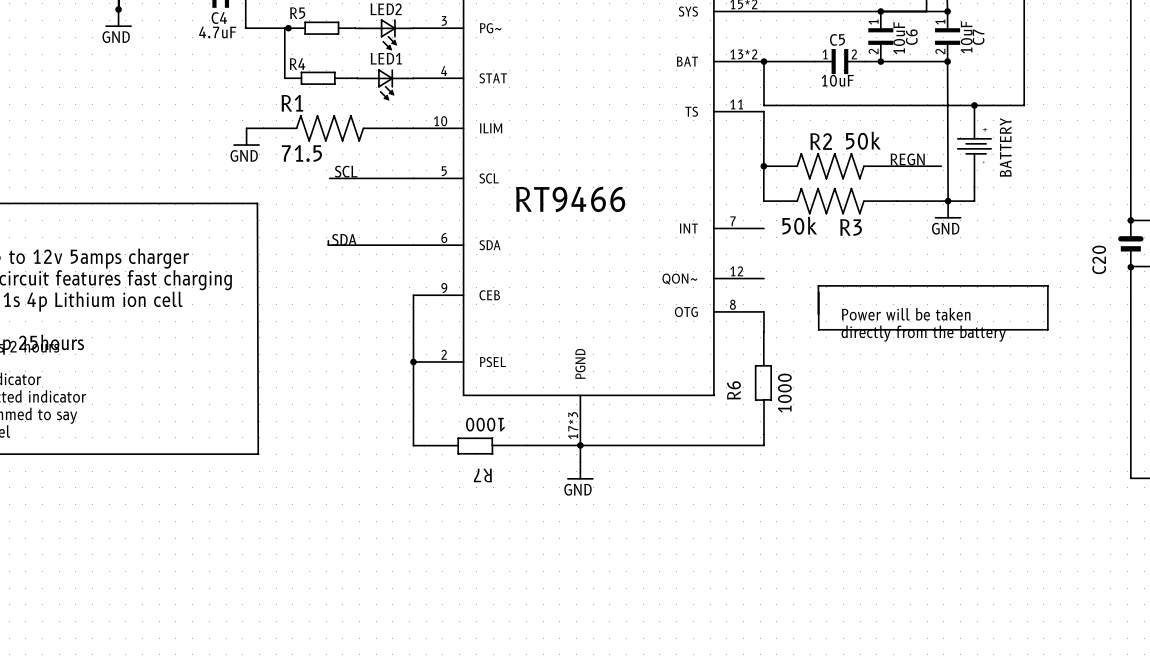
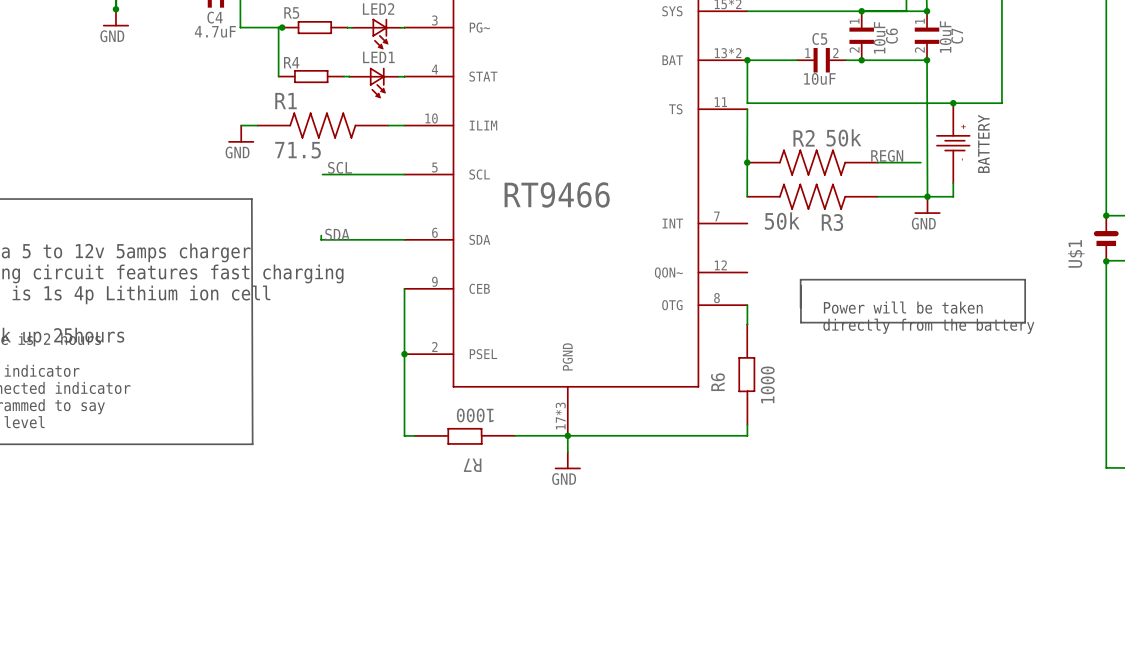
C20 name: C20 (1099, 259) -> U$1 (1076, 253)

